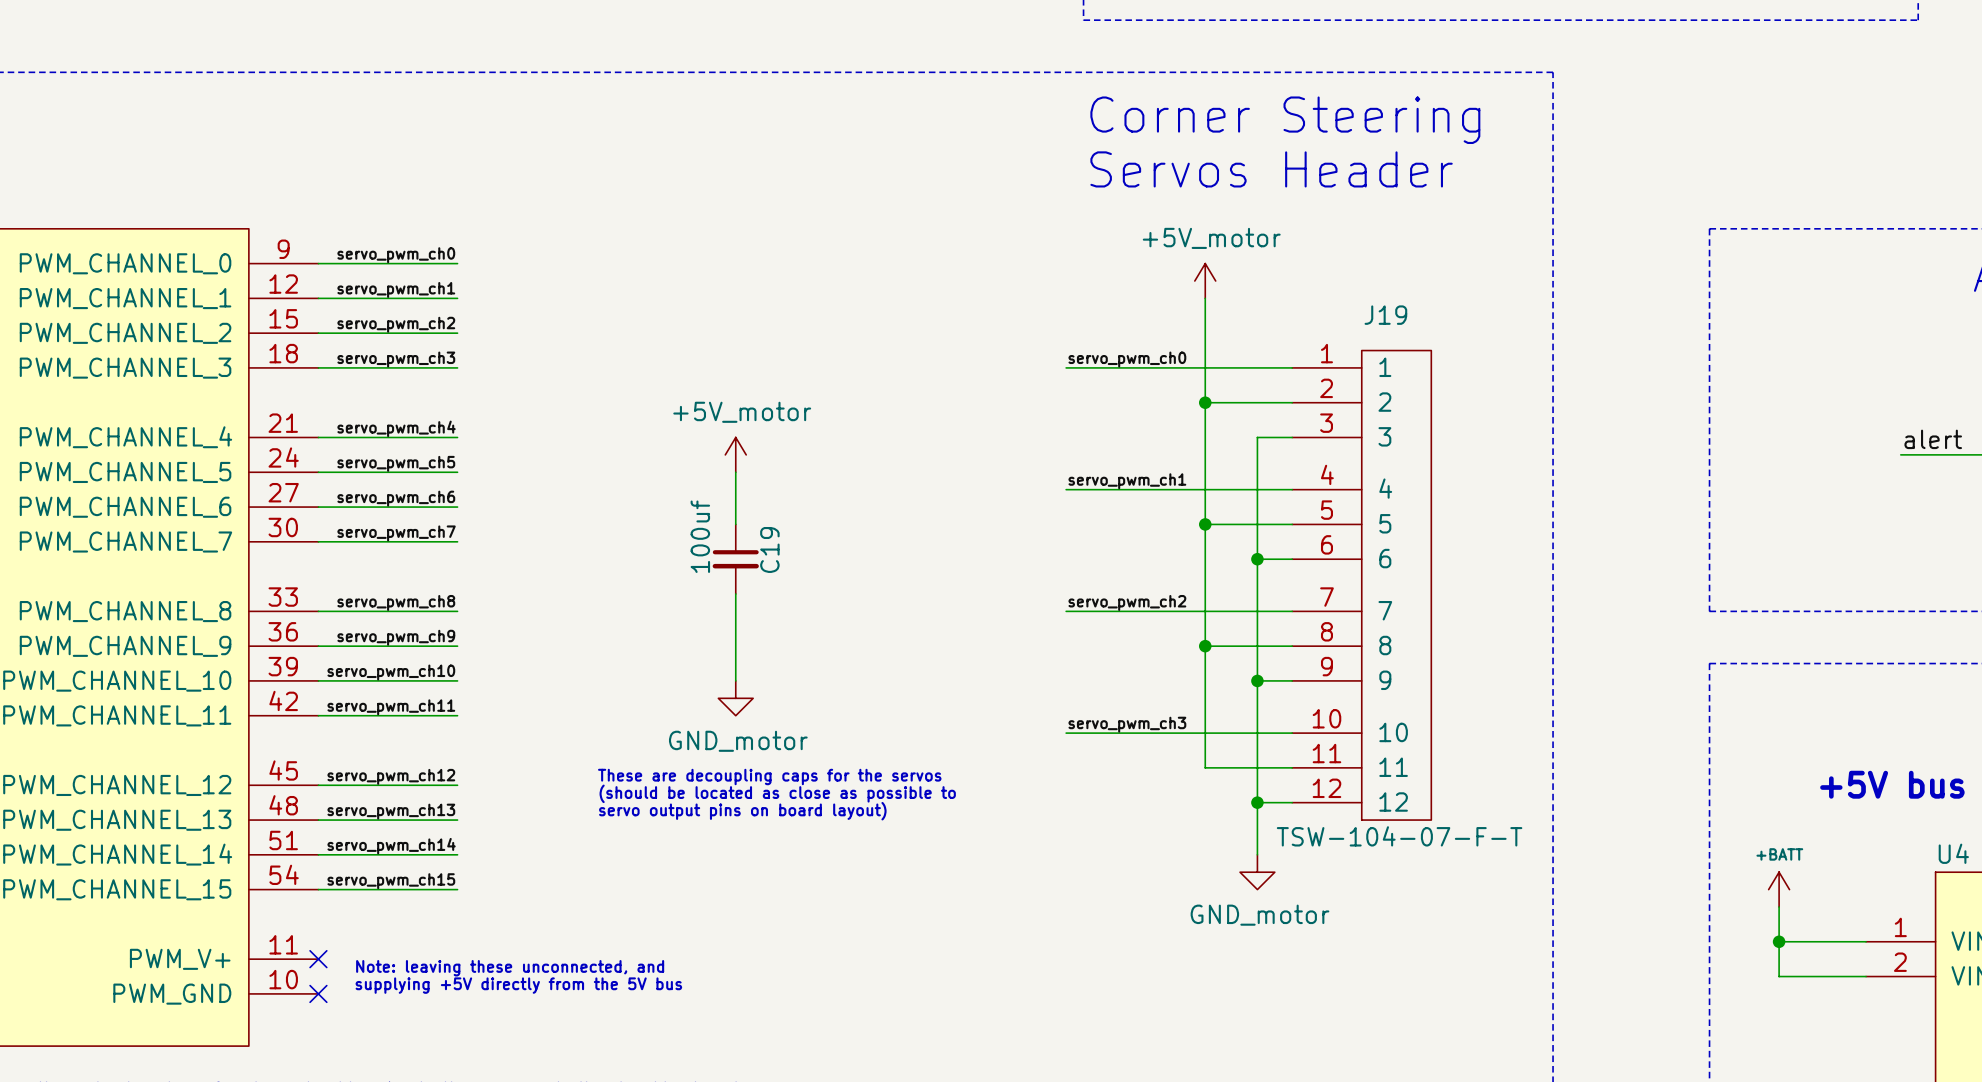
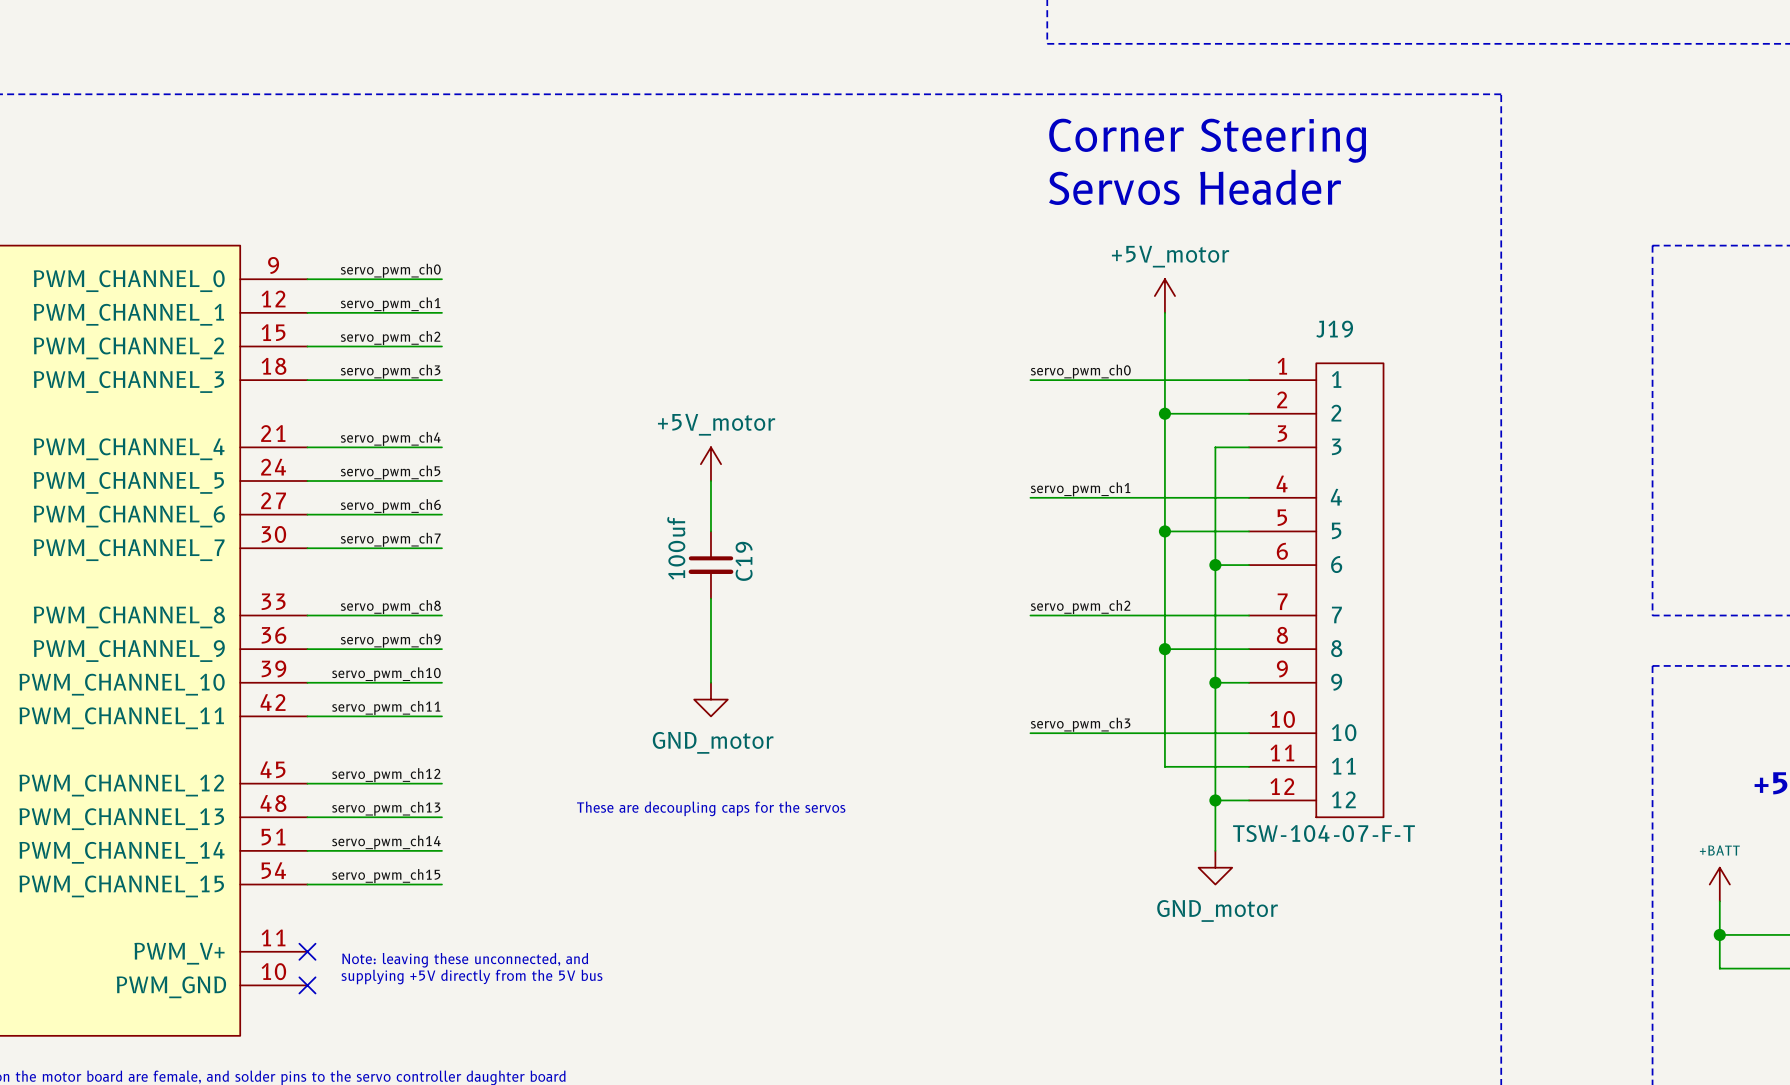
text: These are decoupling caps for the servos (769, 776) -> none
text: (should be located as close as possible to (777, 793) -> none
text: servo output pins on board layout) (742, 811) -> These are decoupling caps for the servos (711, 808)

